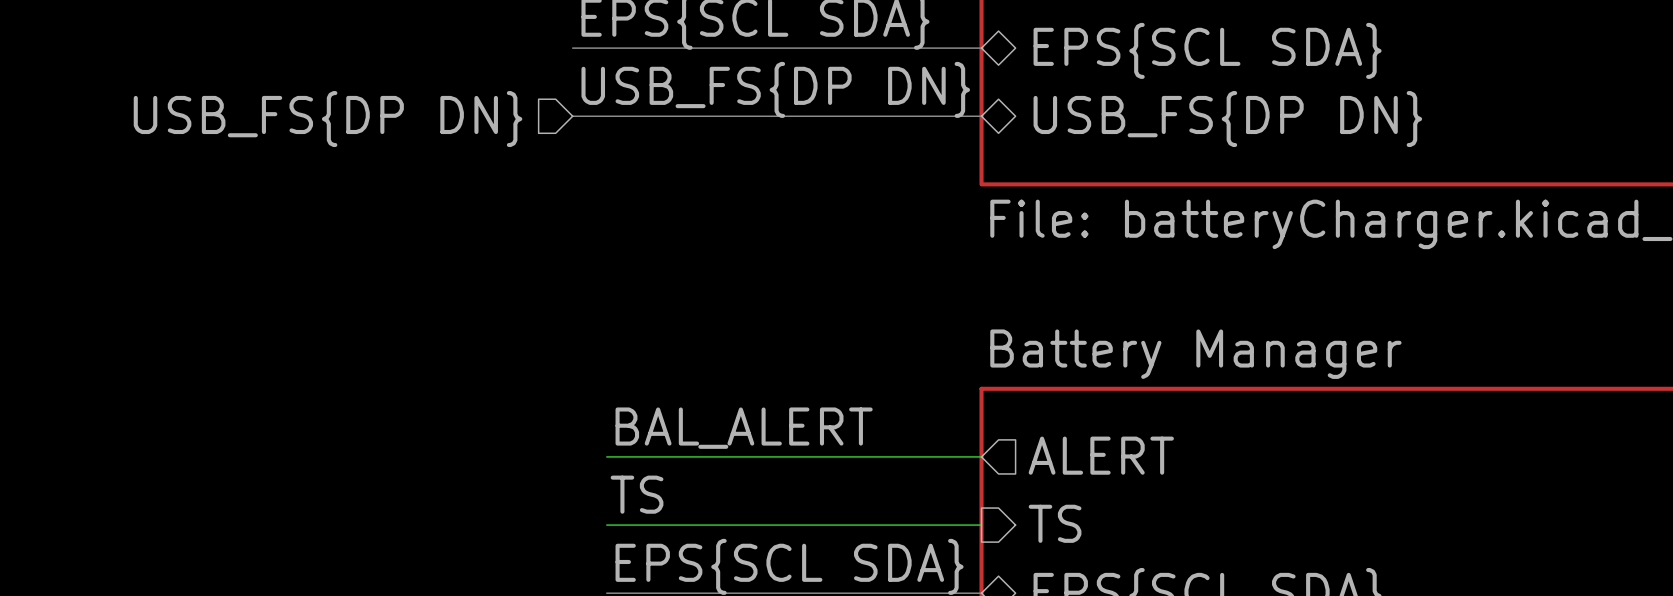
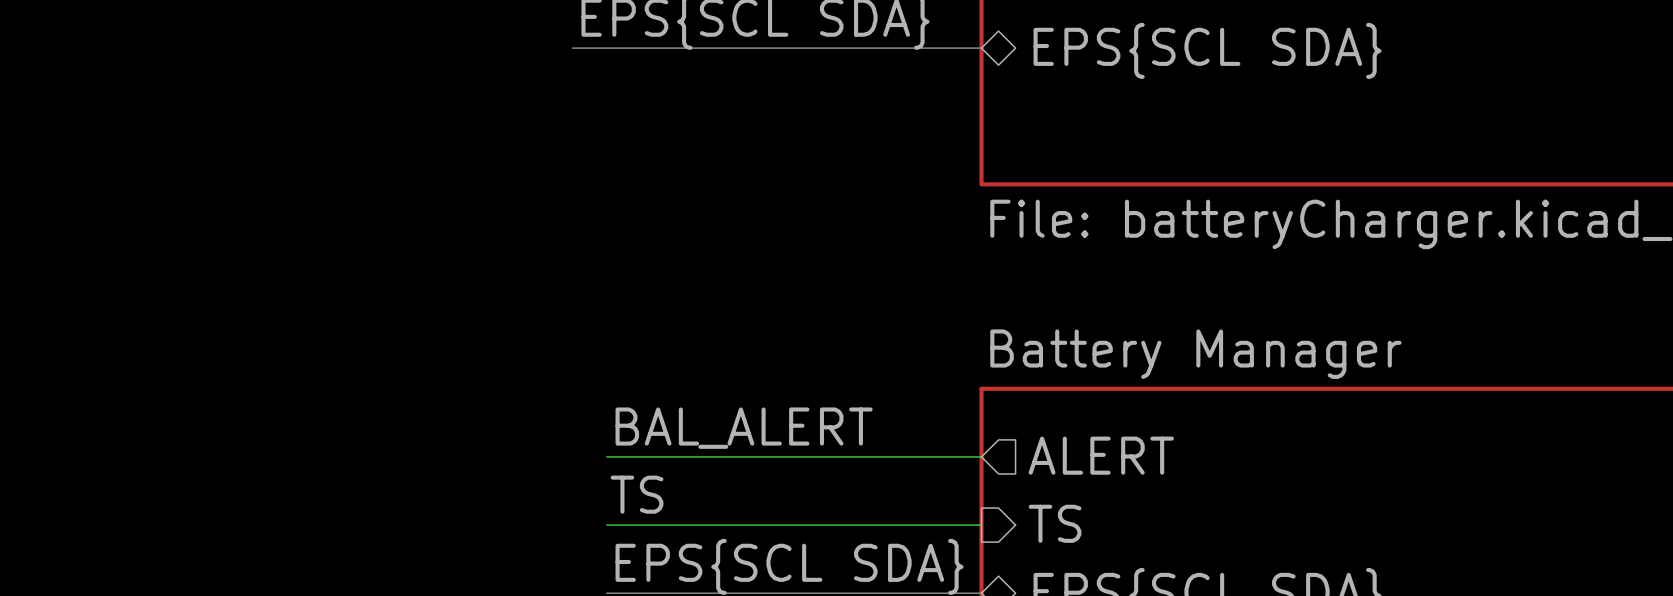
label: USB_FS{DP DN} (775, 89) -> none
bus: (572, 116) (981, 116) -> none
hierarchical label: USB_FS{DP DN} (328, 119) -> none
sheet pin: USB_FS{DP DN} (1227, 119) -> none

